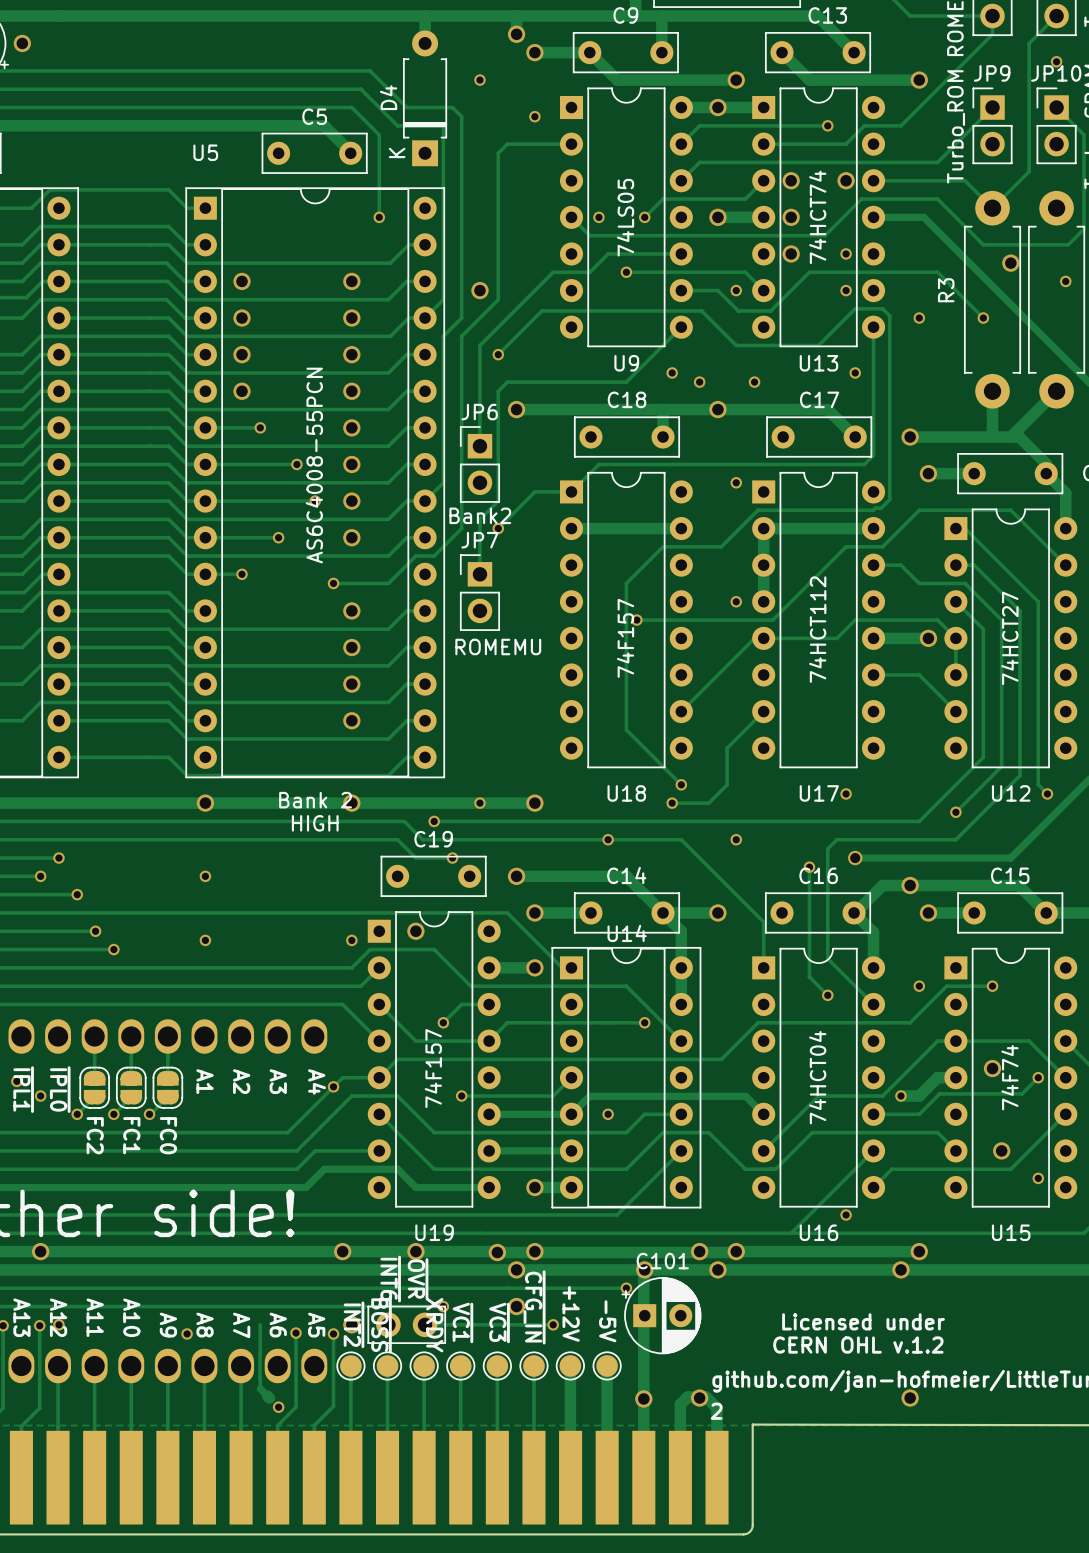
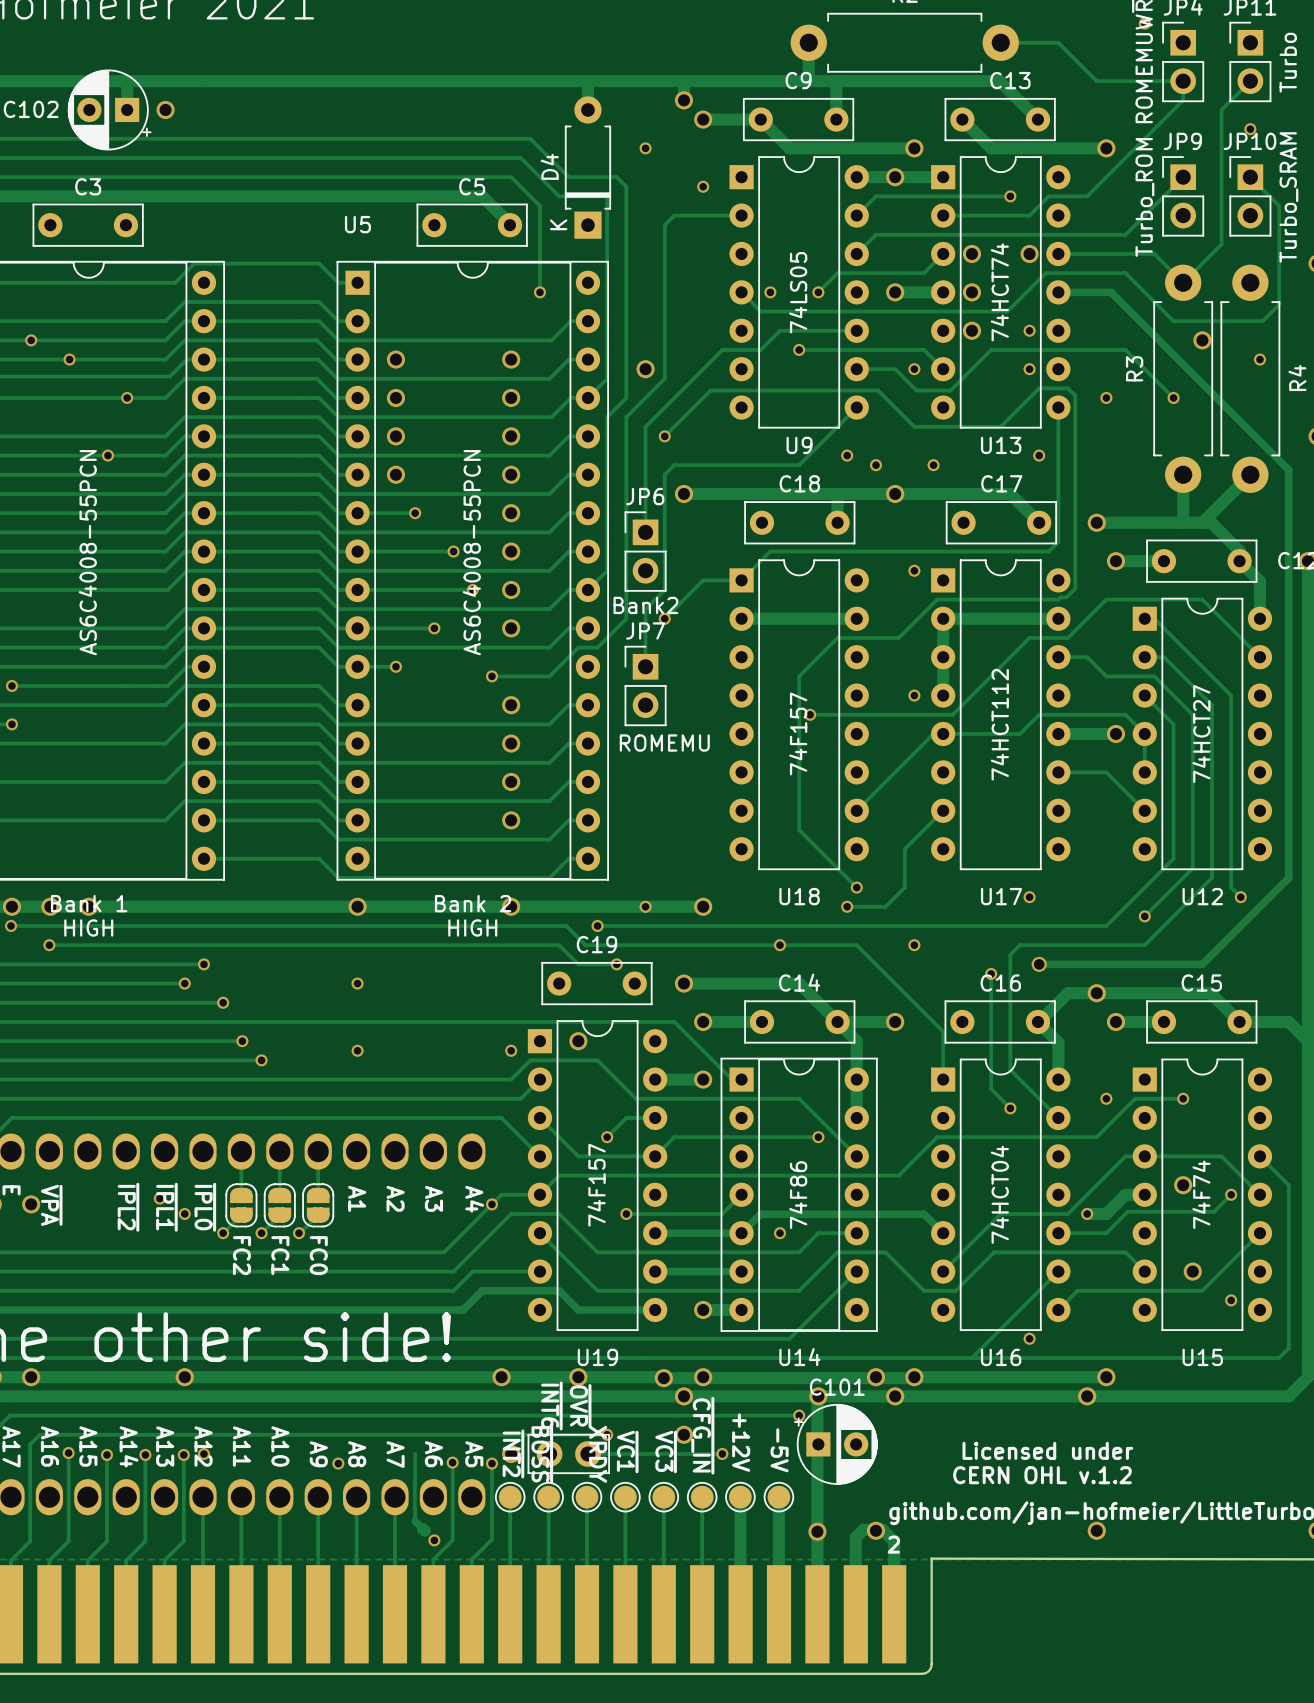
U14 name position: U14 (627, 933) -> U14 (799, 1357)
U14 value: none -> 74F86 (798, 1195)

